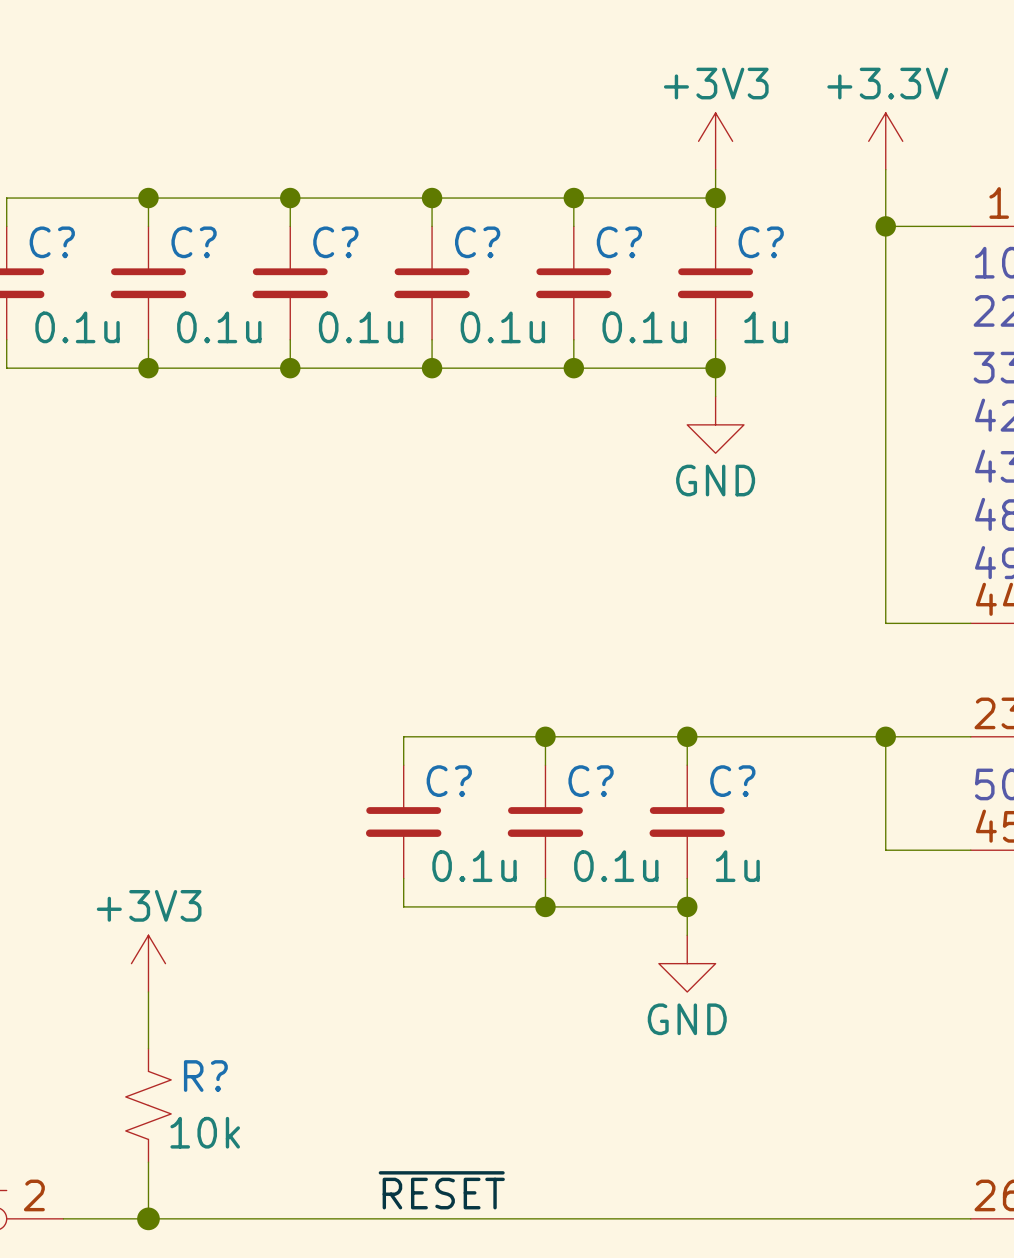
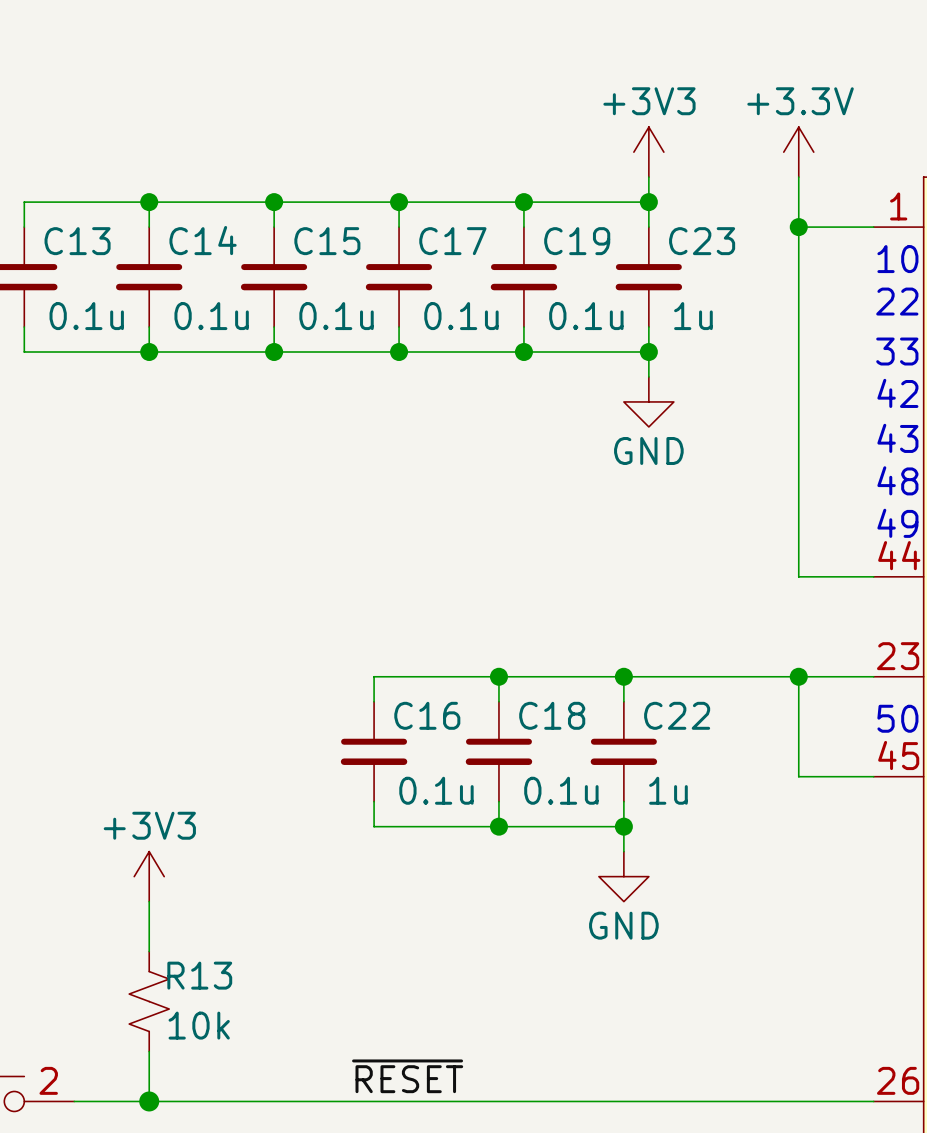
C? name: C? (52, 242) -> C13 (77, 241)
C? name: C? (194, 242) -> C14 (203, 240)
C? name: C? (335, 242) -> C15 (327, 241)
C? name: C? (477, 242) -> C17 (452, 241)
C? name: C? (619, 242) -> C19 (577, 241)
C? name: C? (761, 242) -> C23 (702, 241)
C? name: C? (449, 781) -> C16 (427, 715)
C? name: C? (591, 781) -> C18 (552, 715)
C? name: C? (732, 781) -> C22 (677, 715)
R? name: R? (205, 1076) -> R13 (199, 975)

